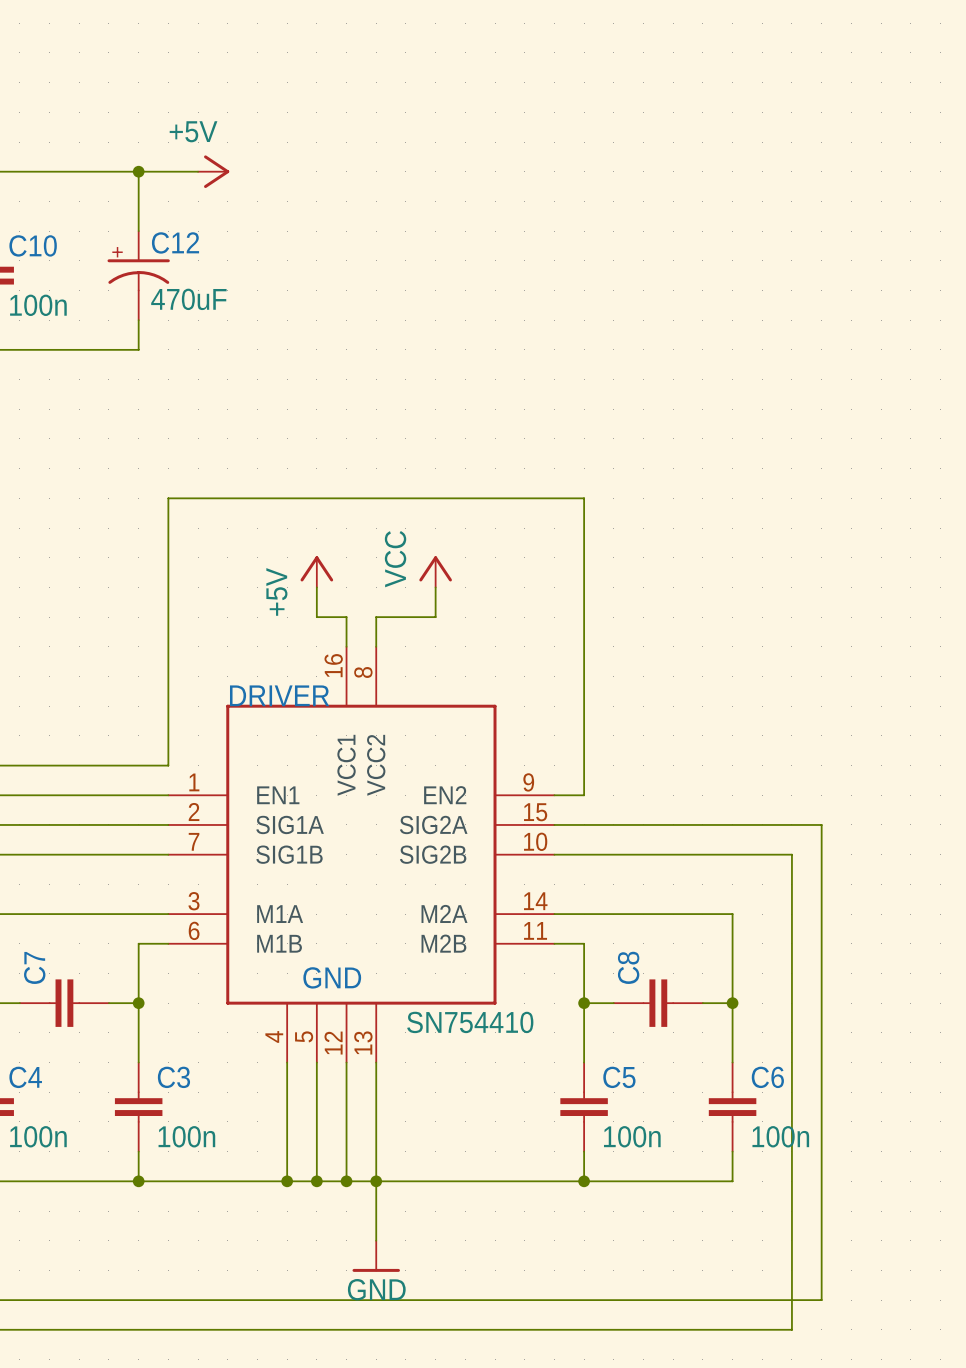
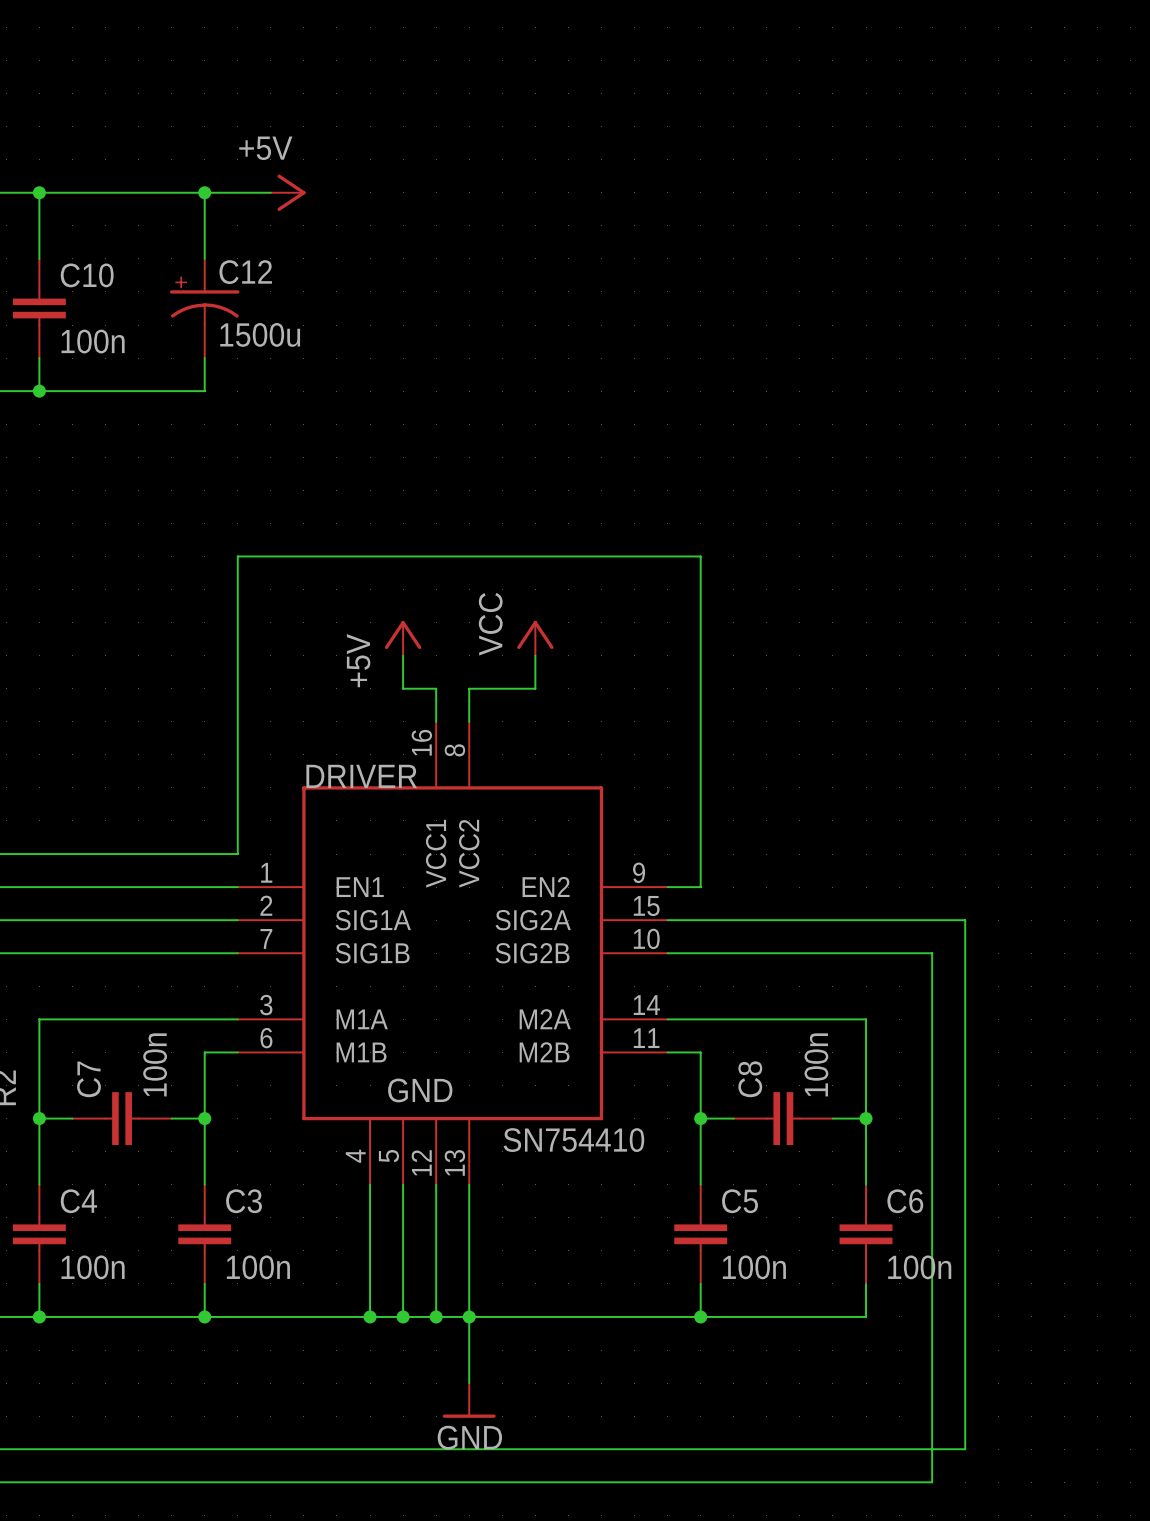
C12 value: 470uF (188, 299) -> 1500u (260, 334)
C7 value: none -> 100n (155, 1064)
C8 value: none -> 100n (816, 1064)

